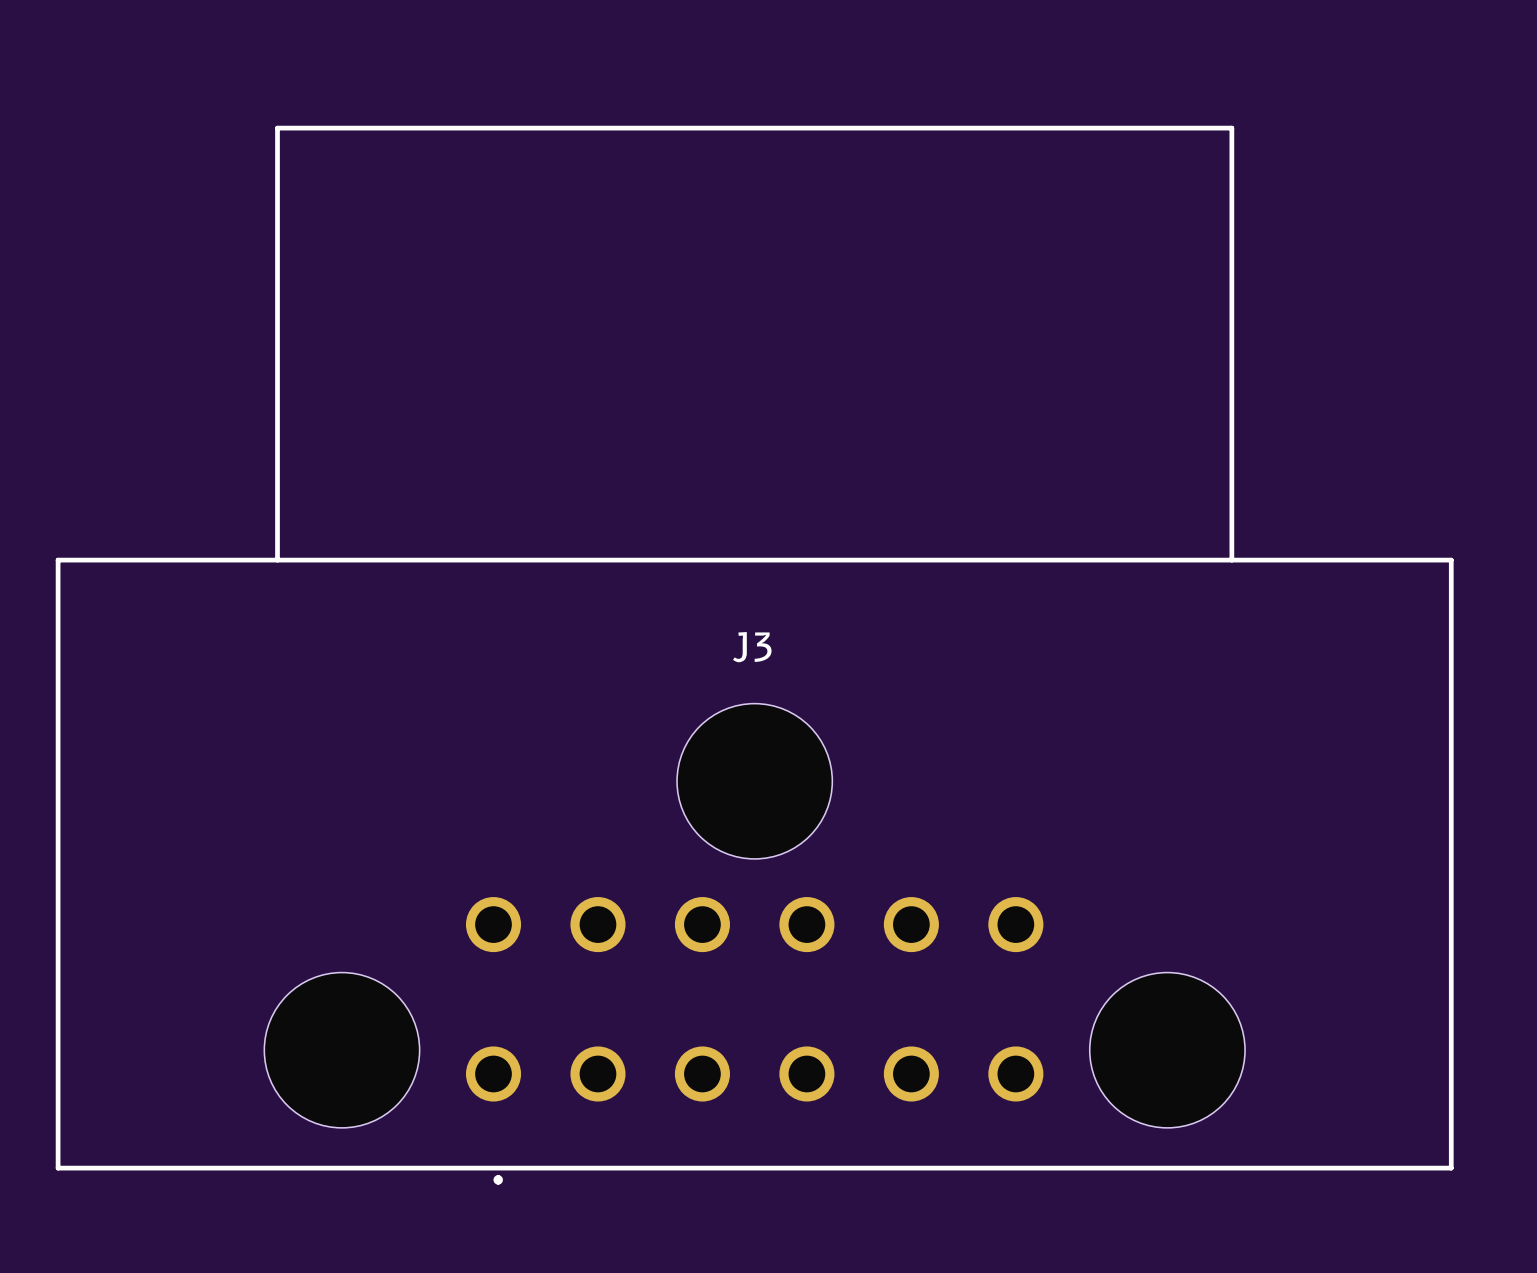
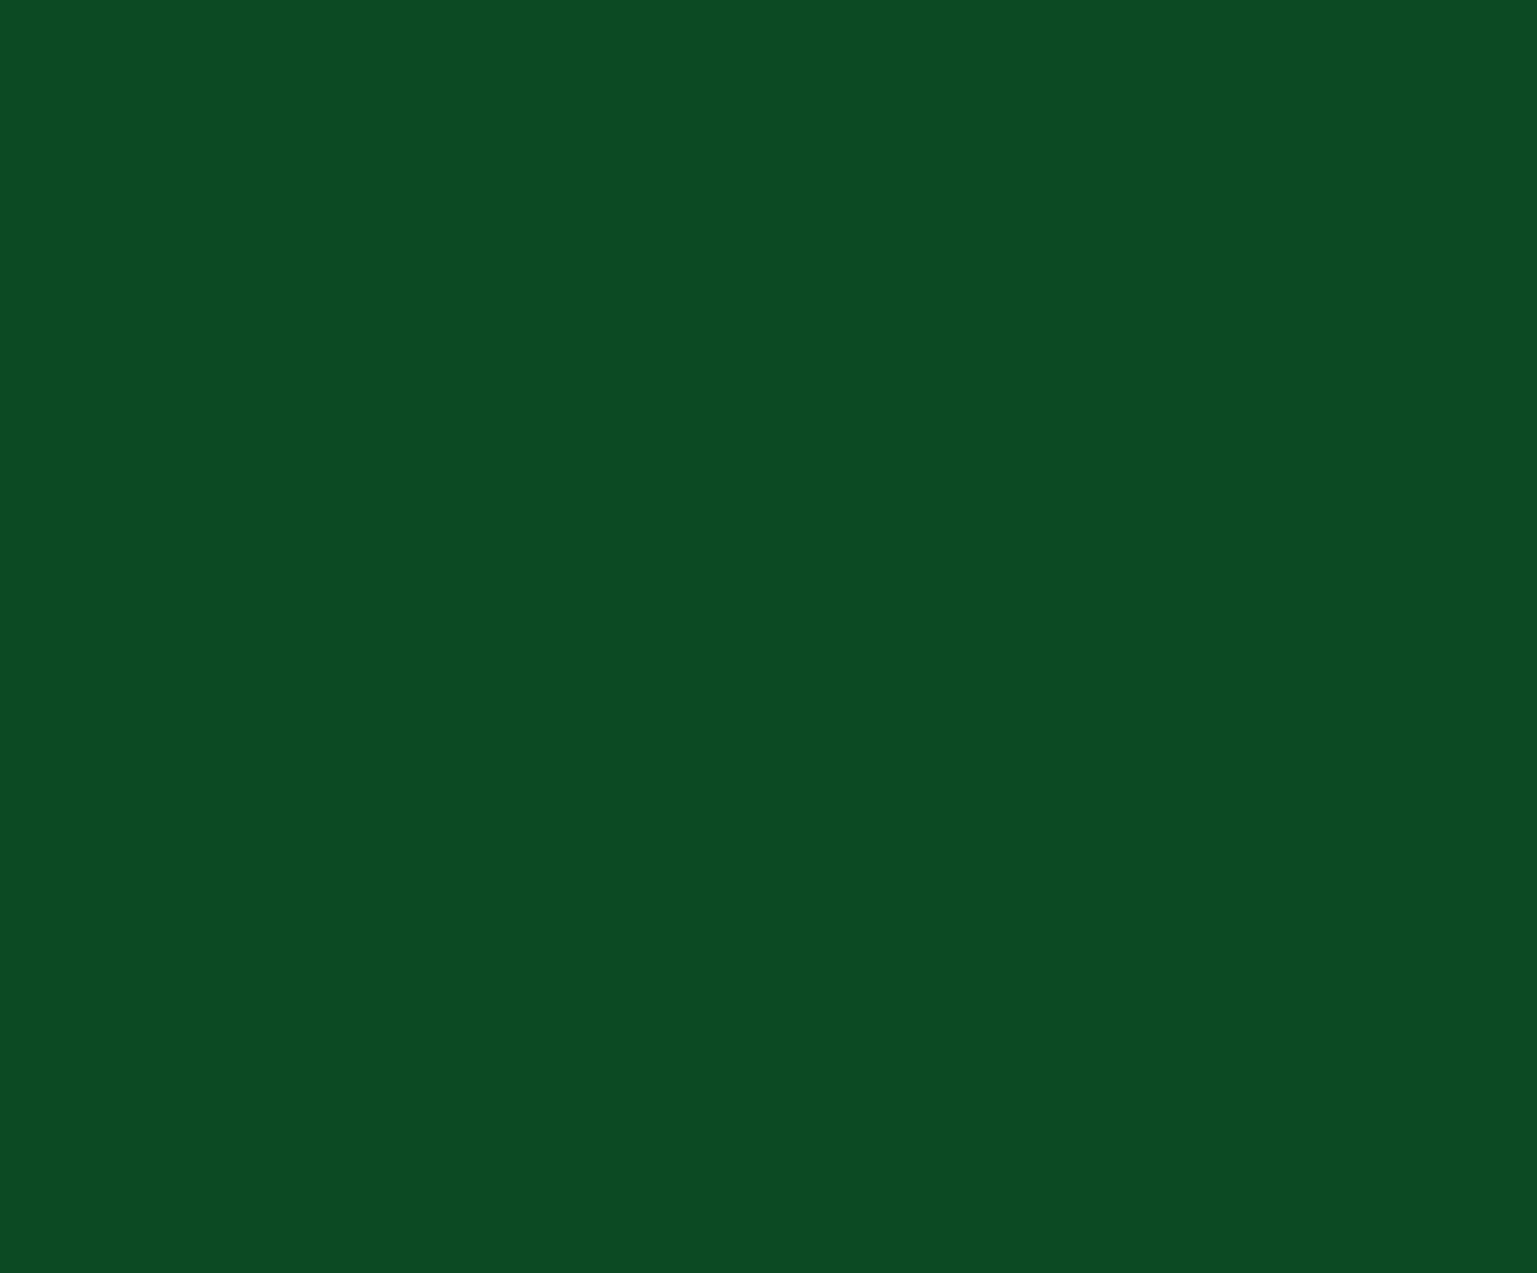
J3: (754, 655) -> none

